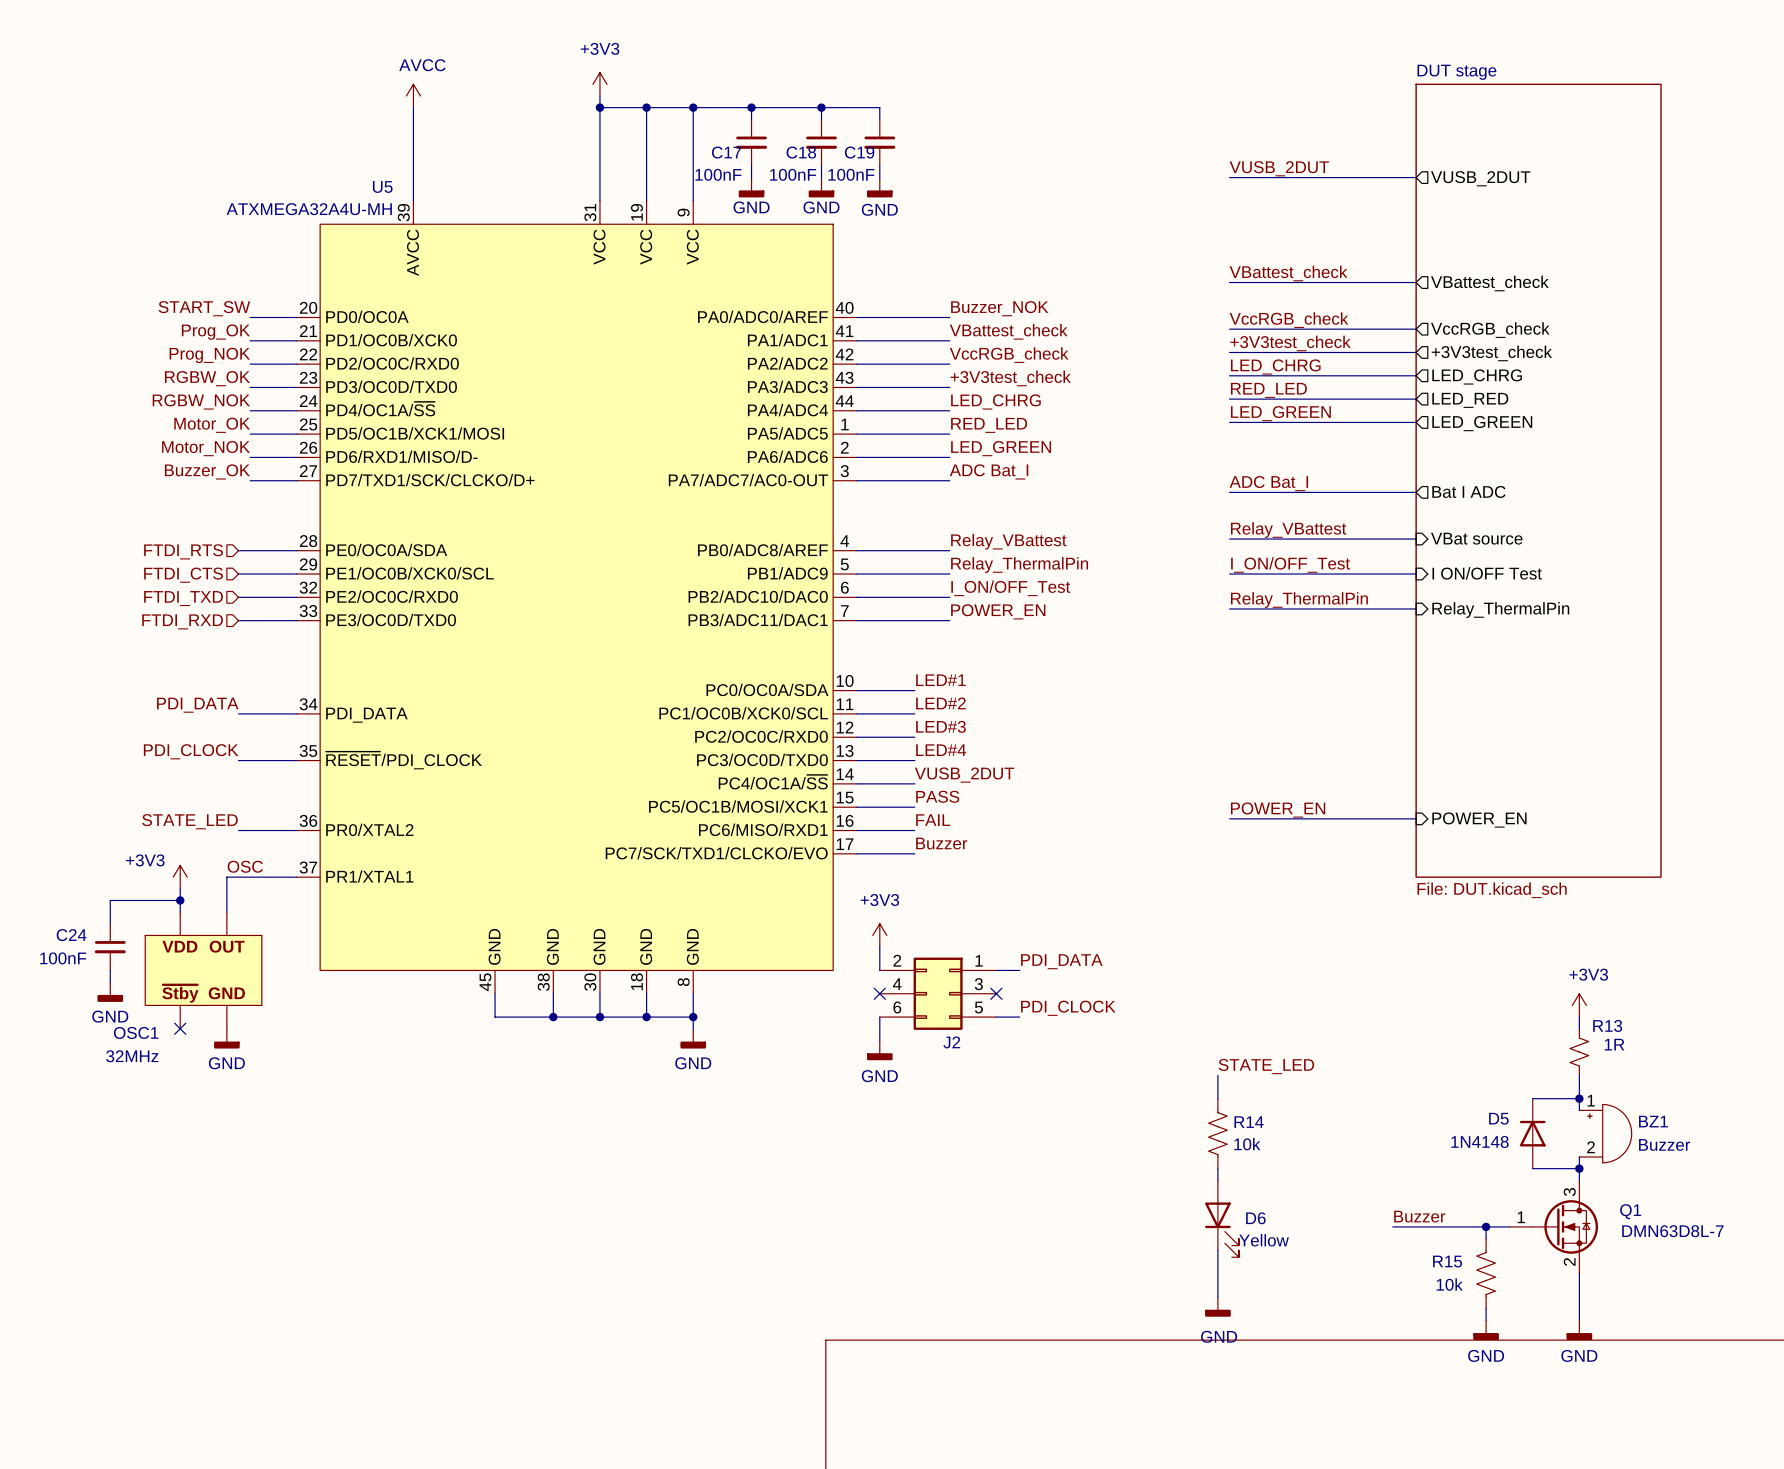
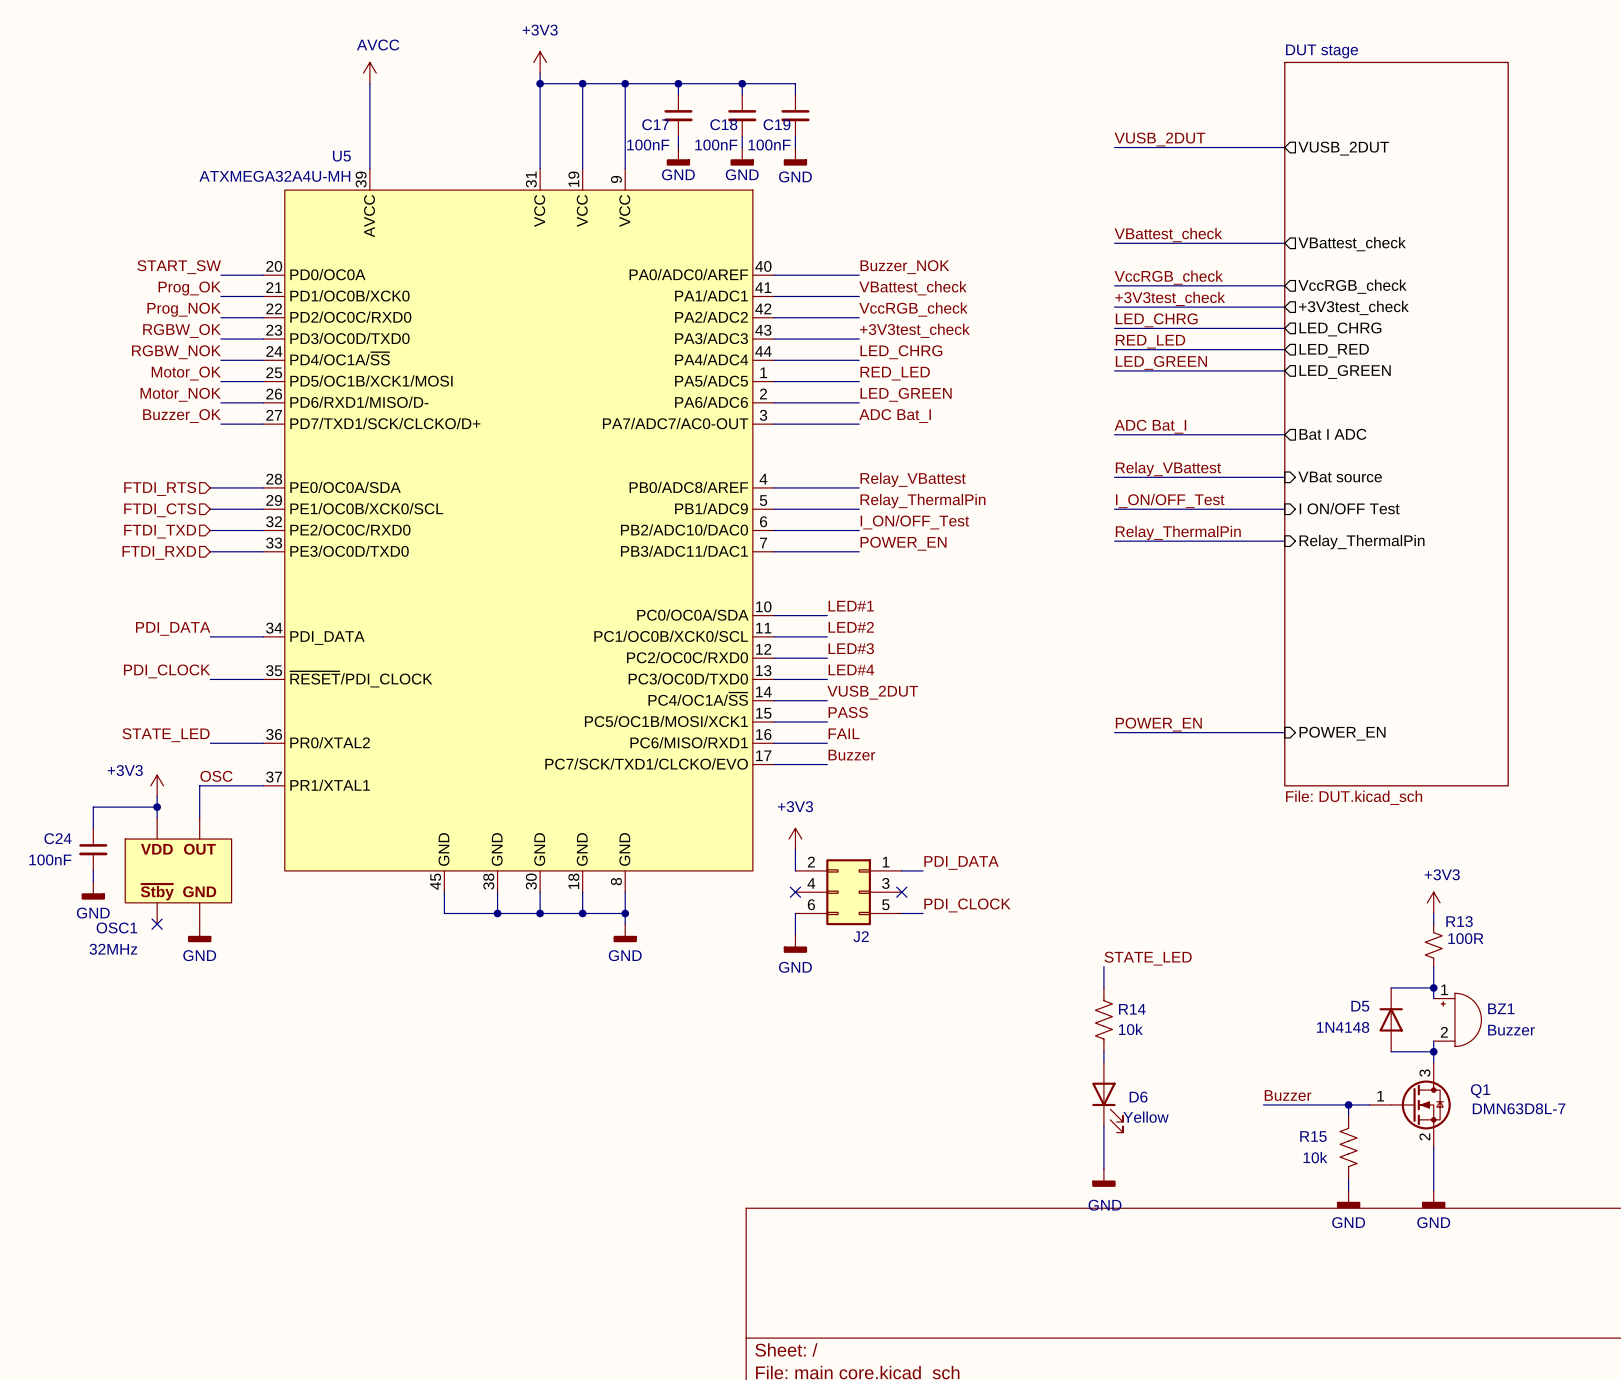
R13 value: 1R (1614, 1044) -> 100R (1465, 938)

